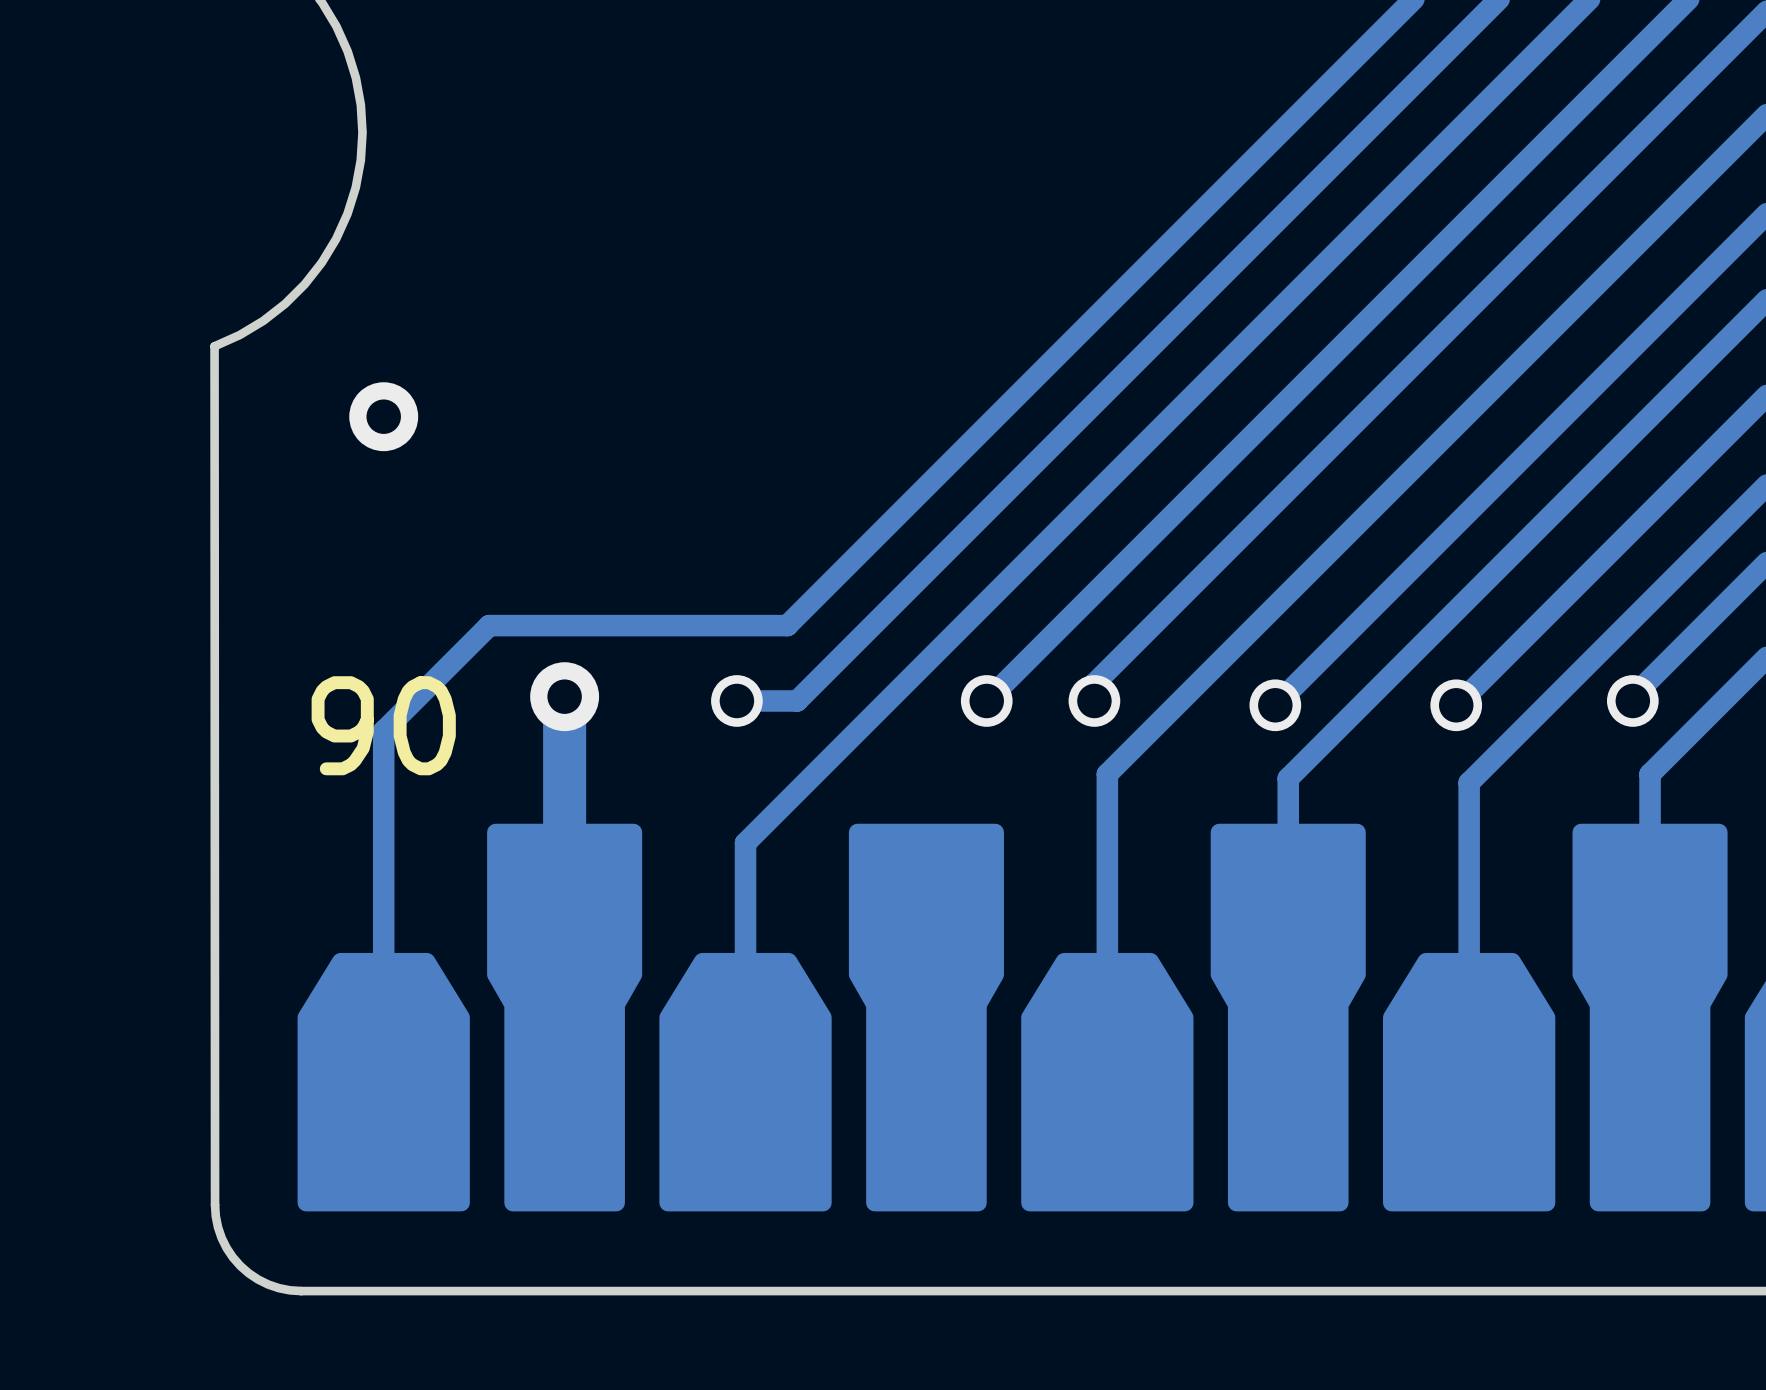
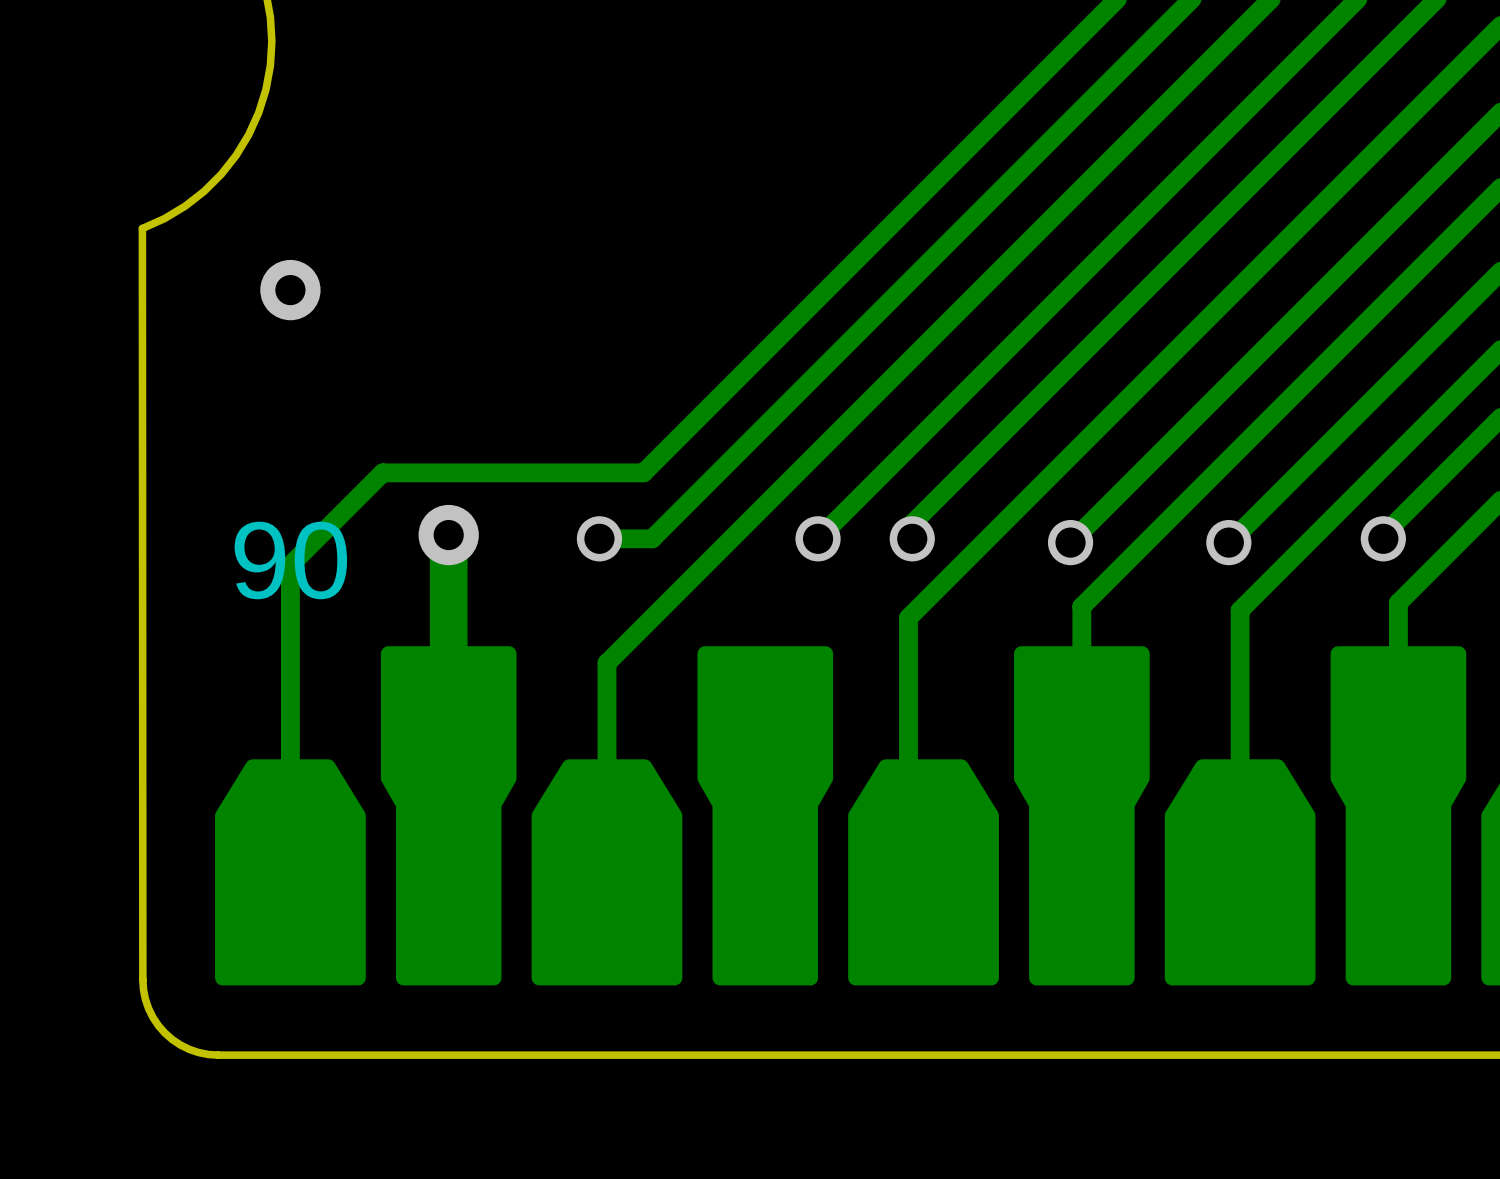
track: (1107, 774) (1107, 1032) (1090, 1049) -> (923, 602) (908, 617) (908, 844)

